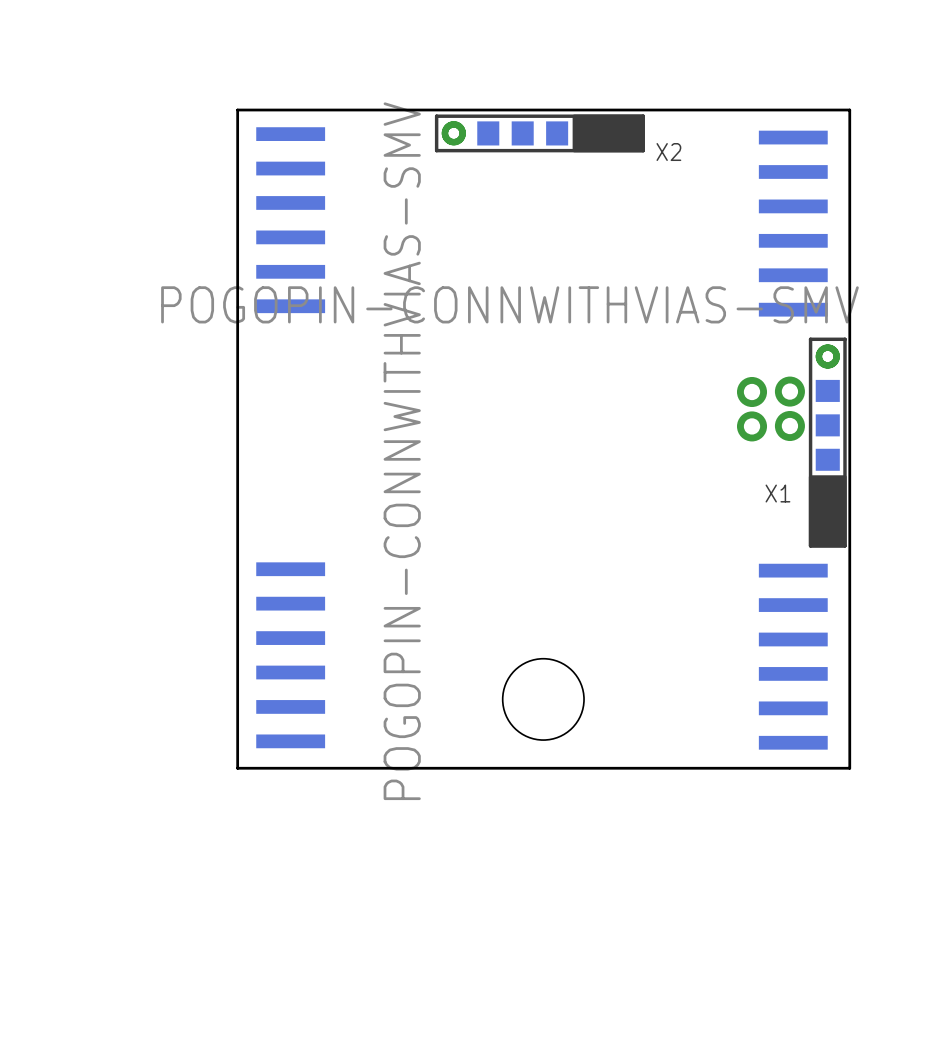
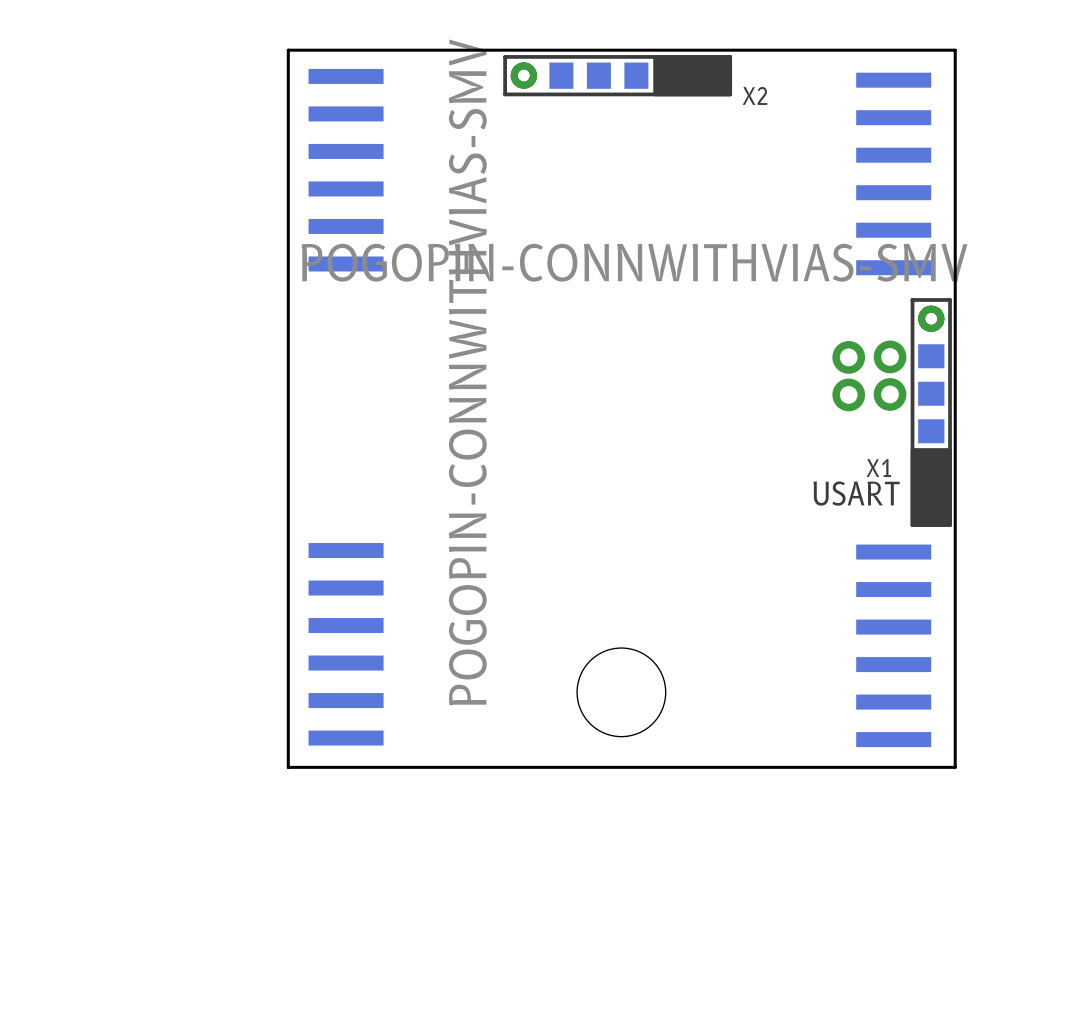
text: none -> USART (856, 493)

